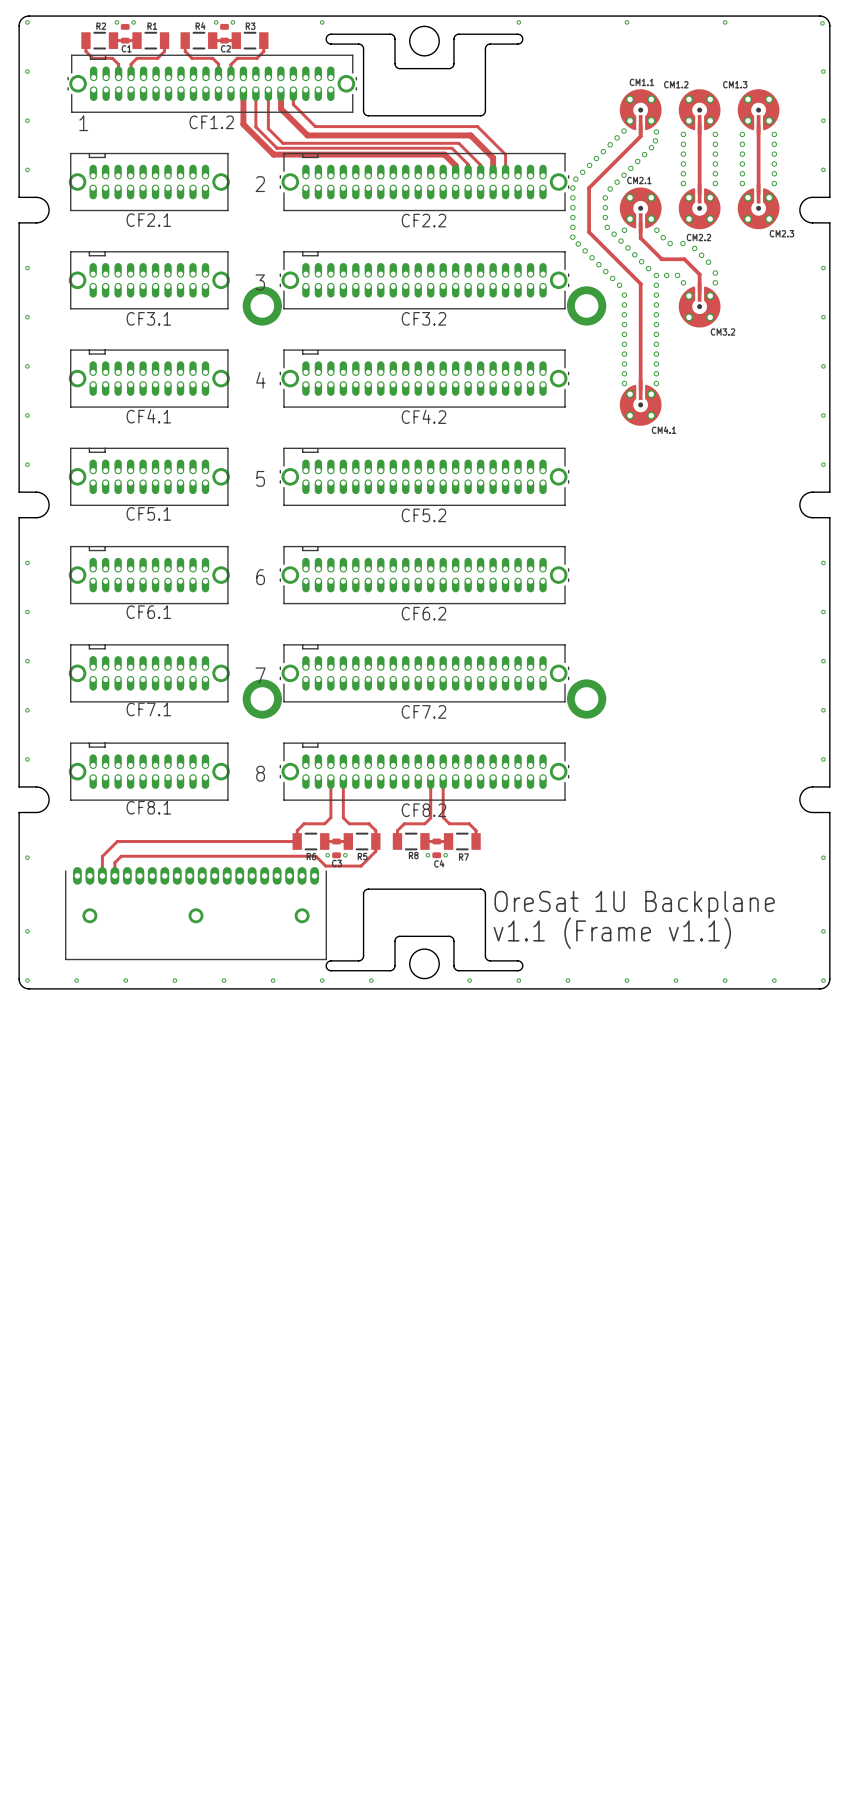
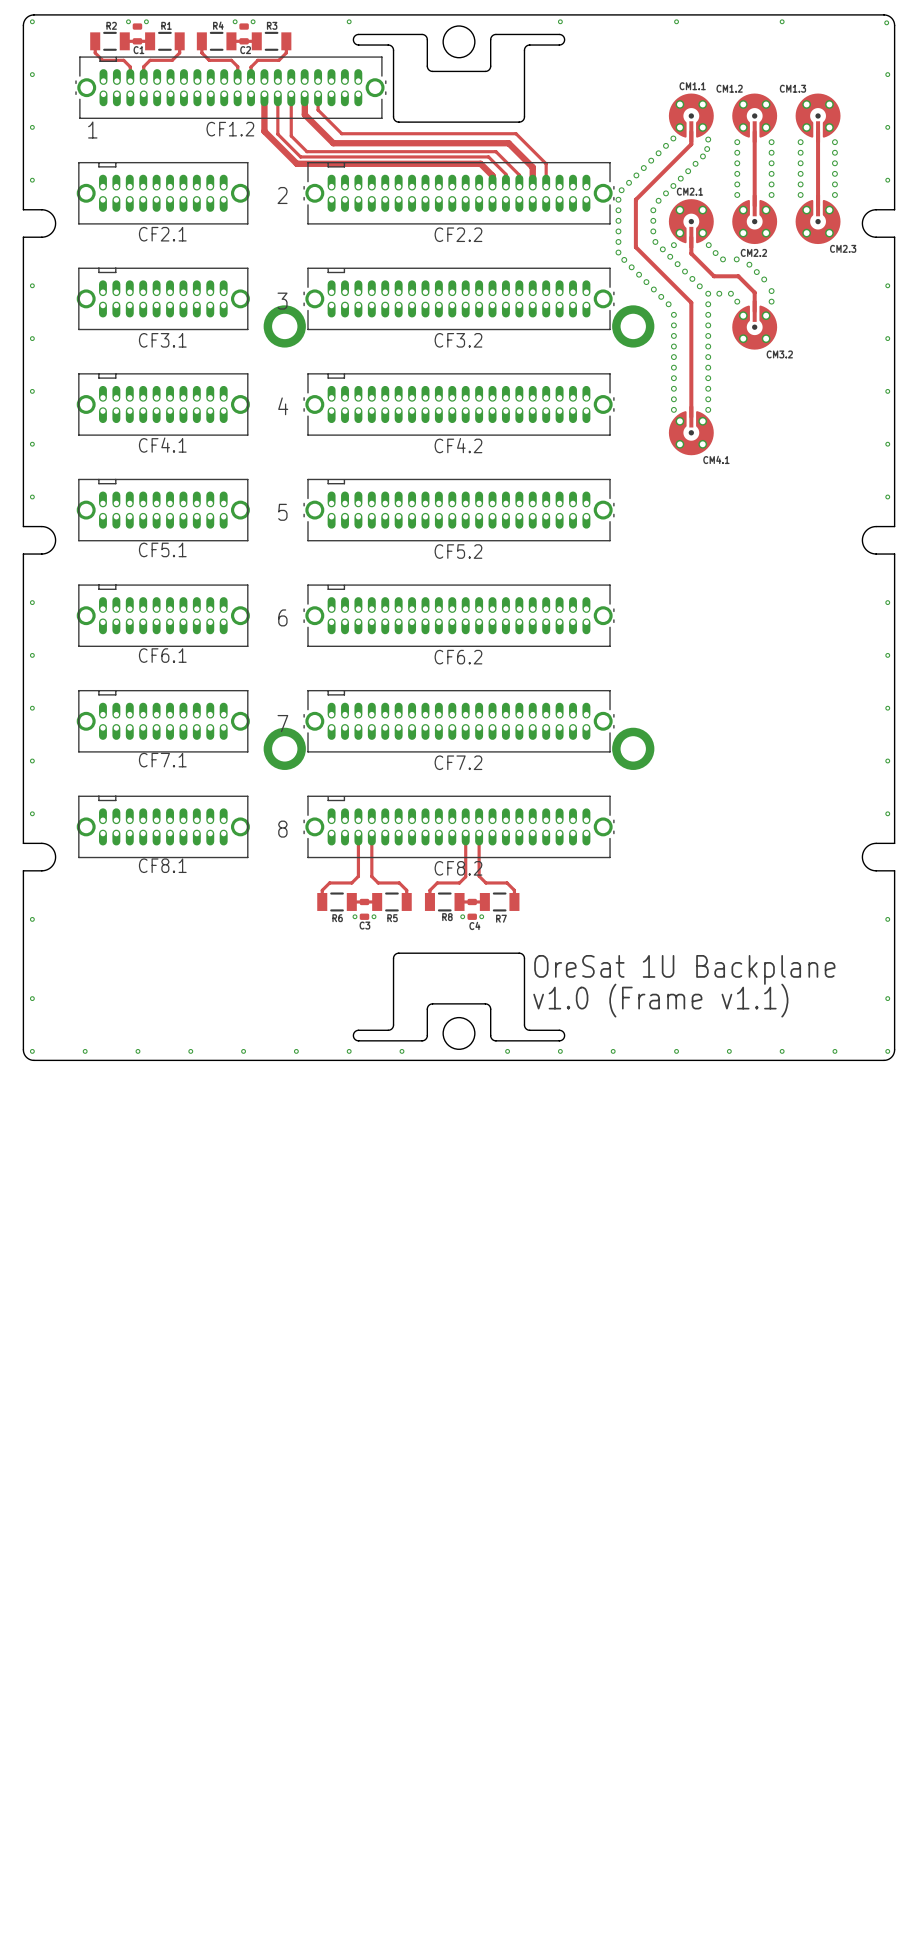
track: (297, 841) (117, 841) (102, 856) (102, 875) -> none
track: (375, 841) (375, 851) (361, 866) (325, 866) (315, 856) (121, 856) (114, 862) (114, 875) -> none
part: (196, 913) -> none
text: v1.1 (Frame v1.1) (612, 933) -> v1.0 (Frame v1.1) (660, 1000)

